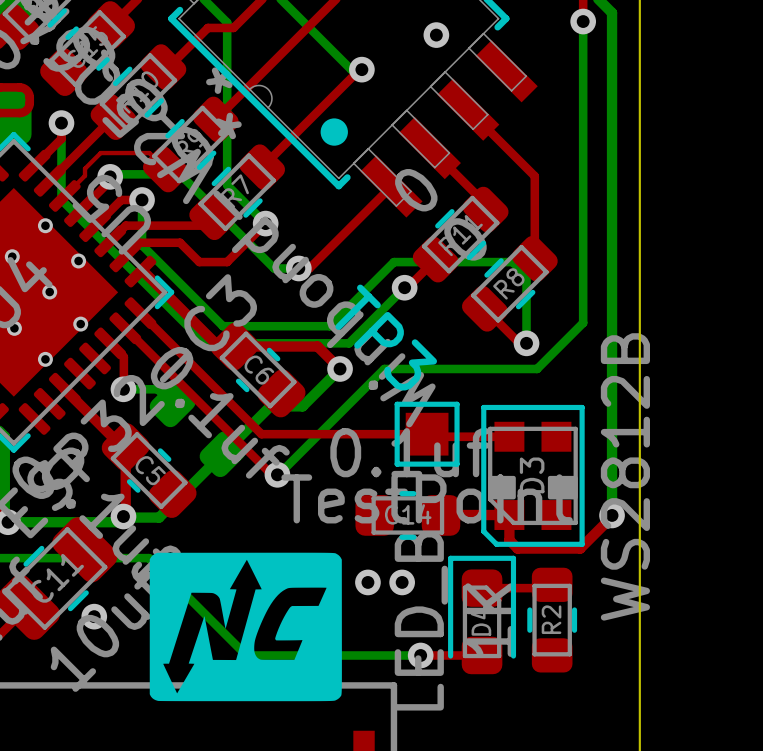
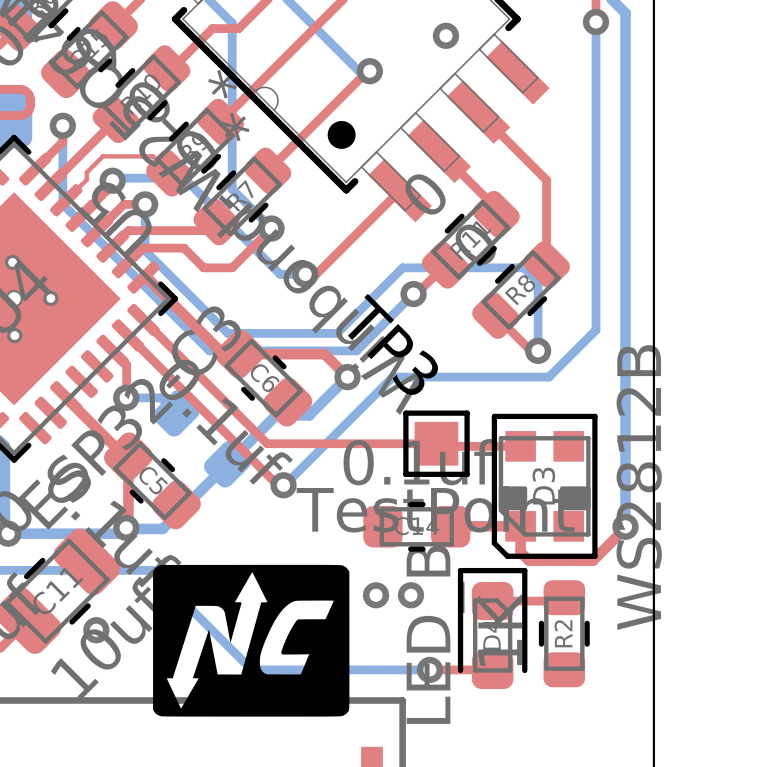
via: (45, 225) -> none
via: (78, 261) -> none
via: none -> (14, 298)
via: (80, 324) -> none
via: (45, 359) -> none

